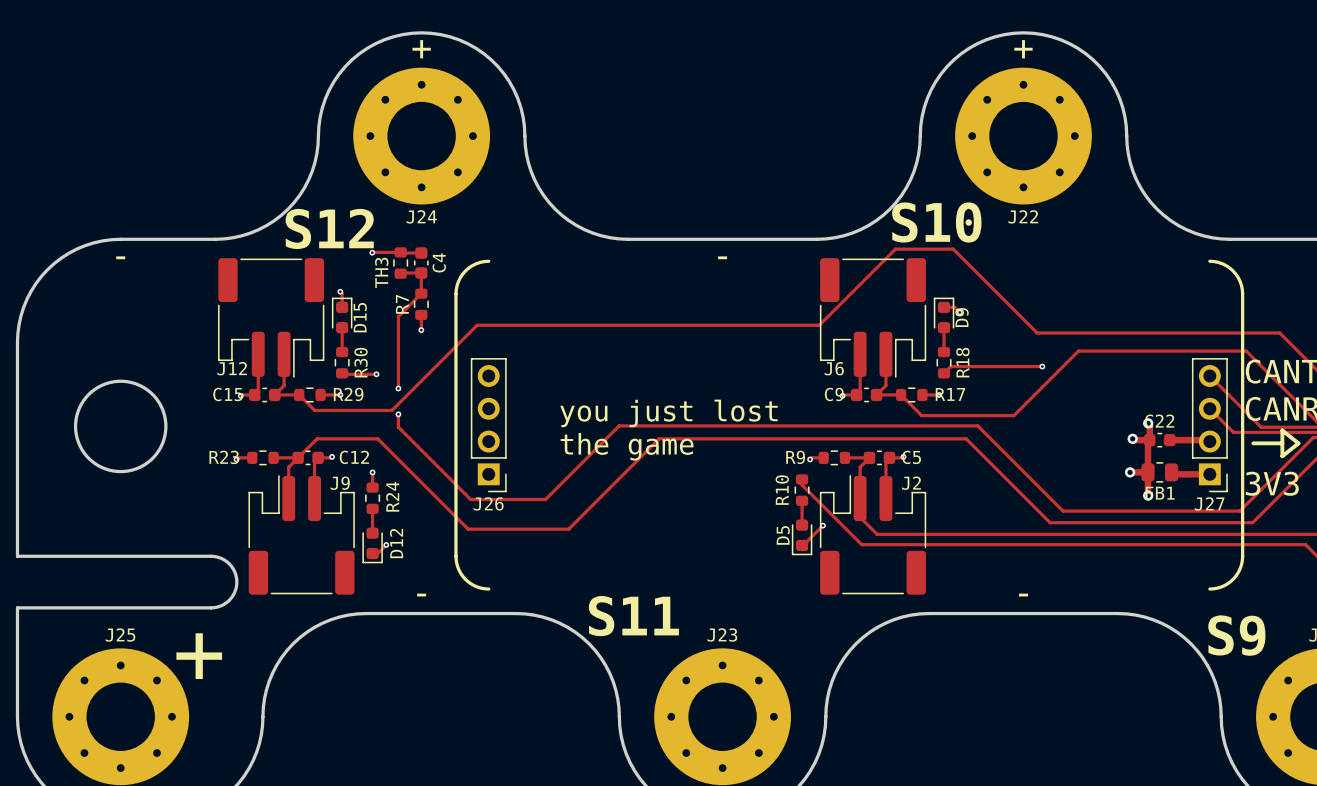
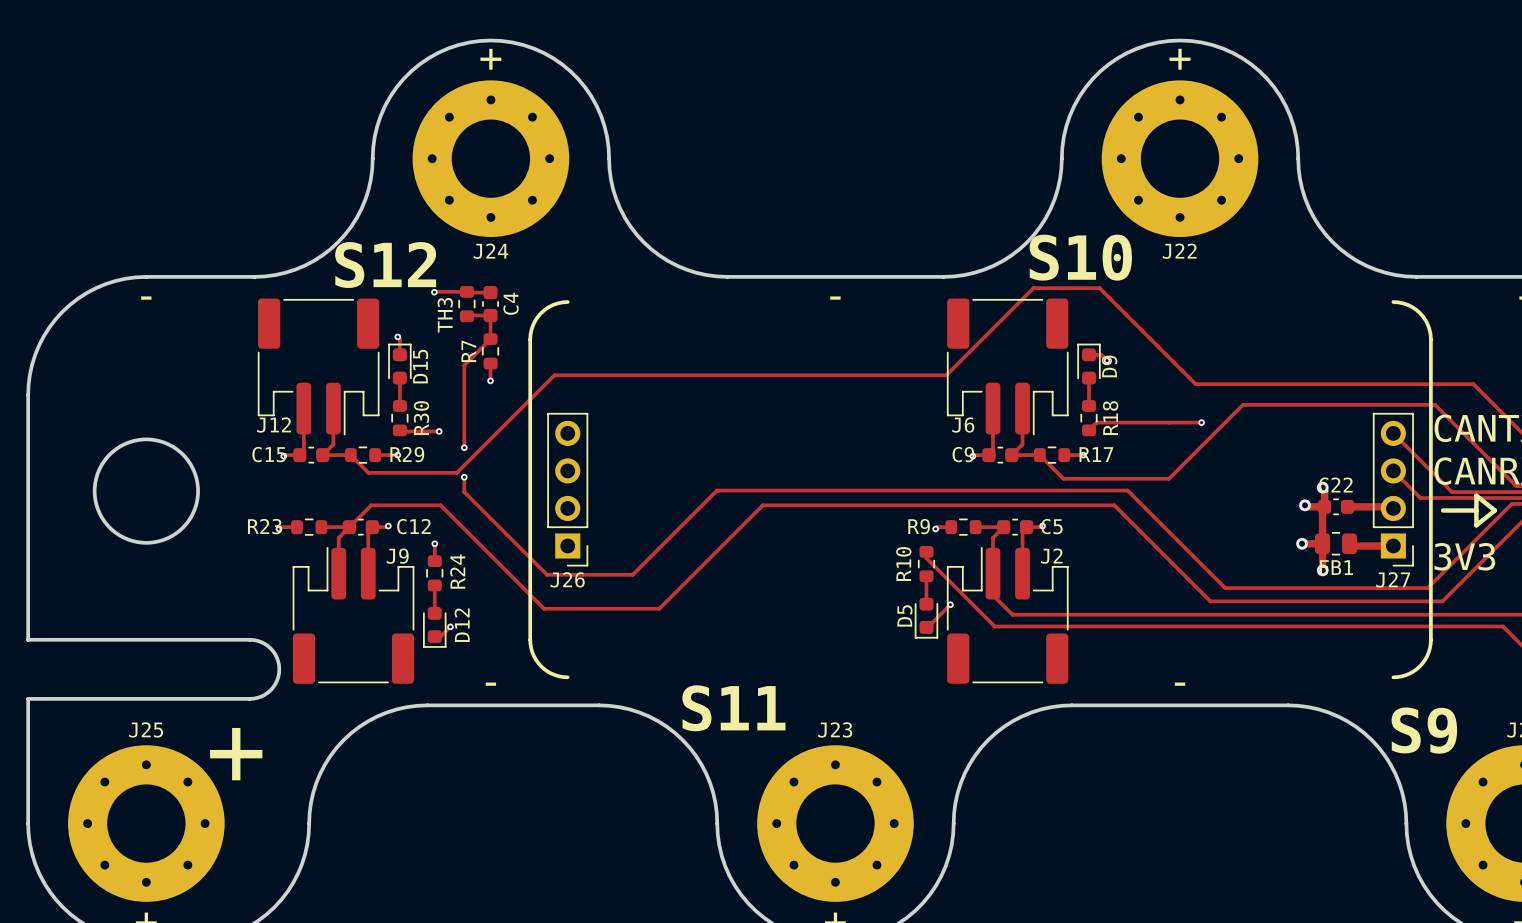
text: you just lost (668, 413) -> none
text: the game (627, 446) -> none

